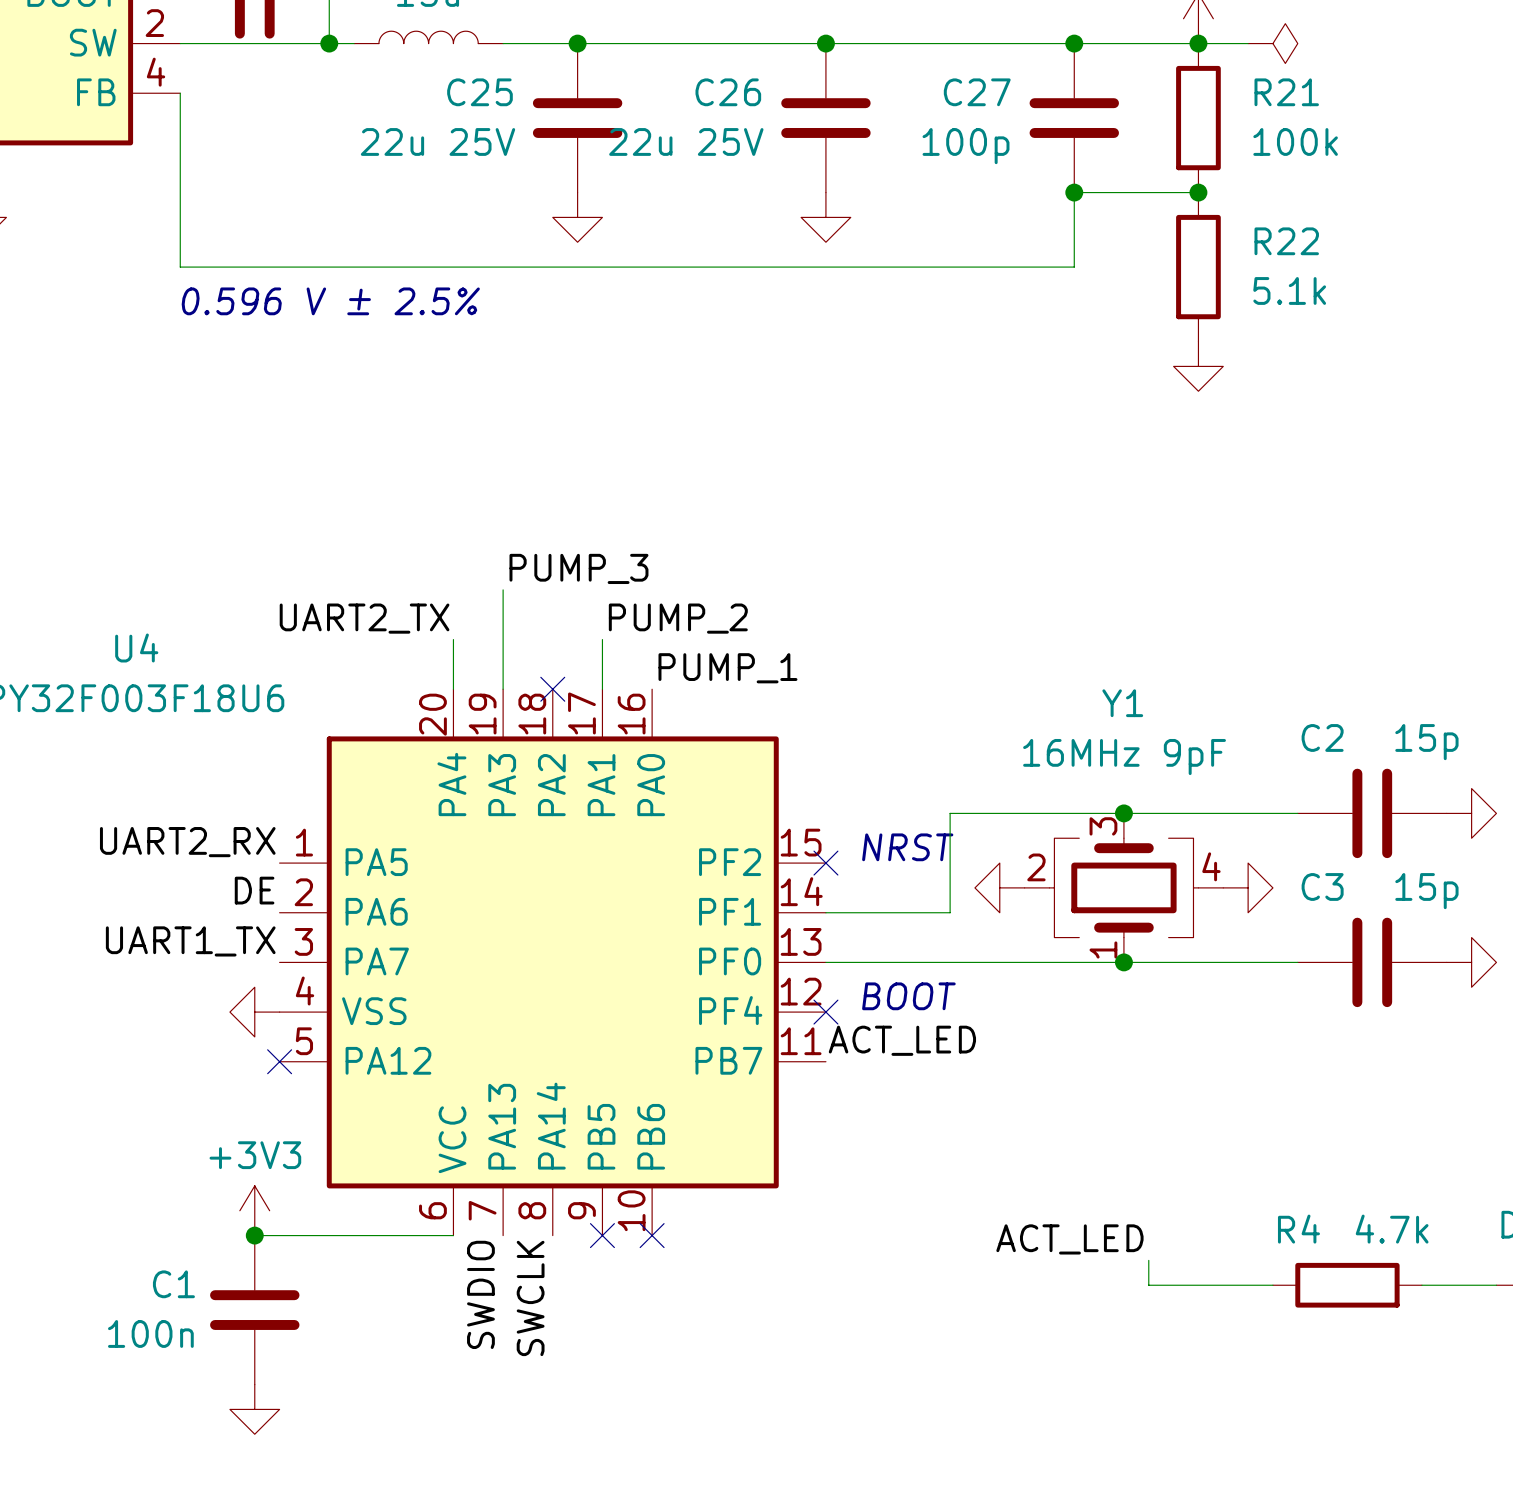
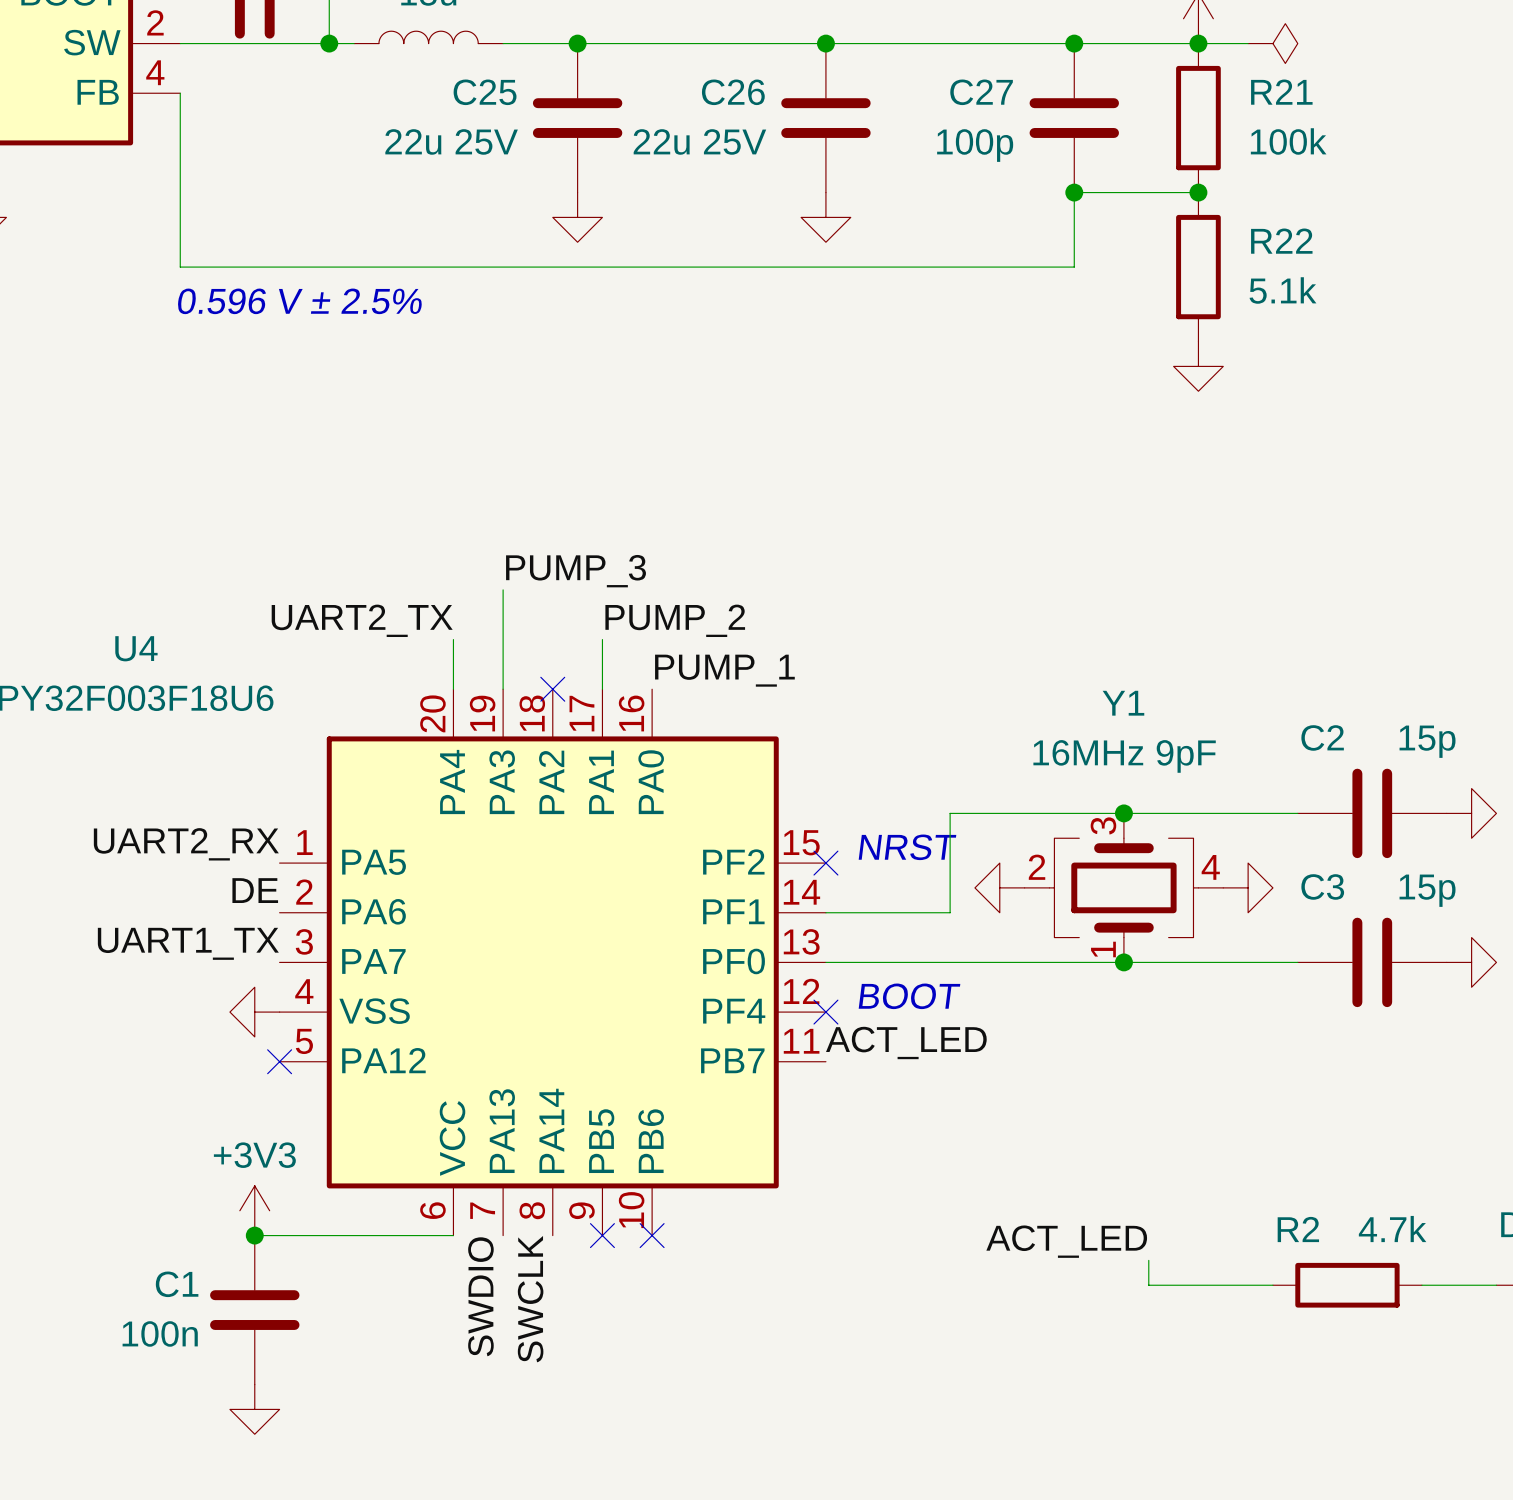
R4 name: R4 (1298, 1229) -> R2 (1298, 1229)

